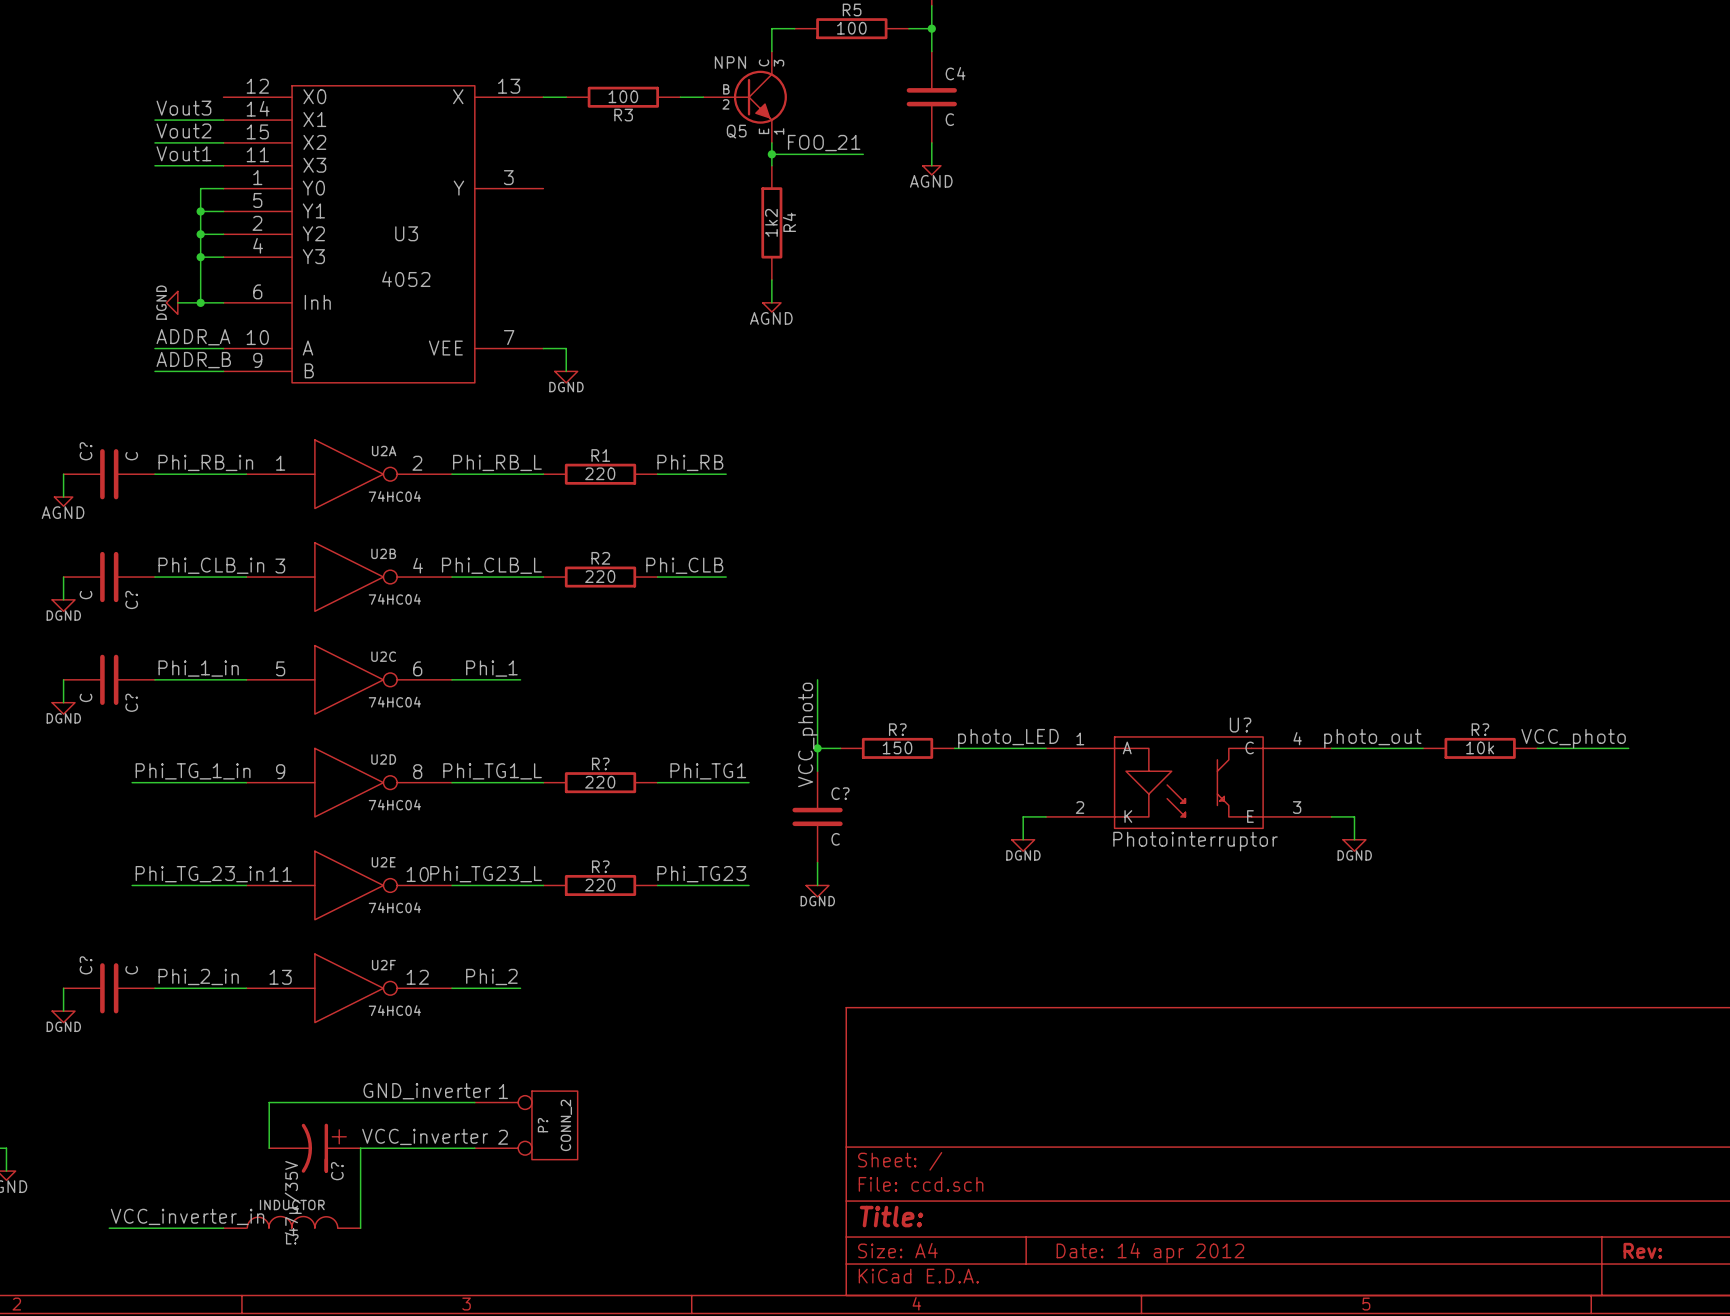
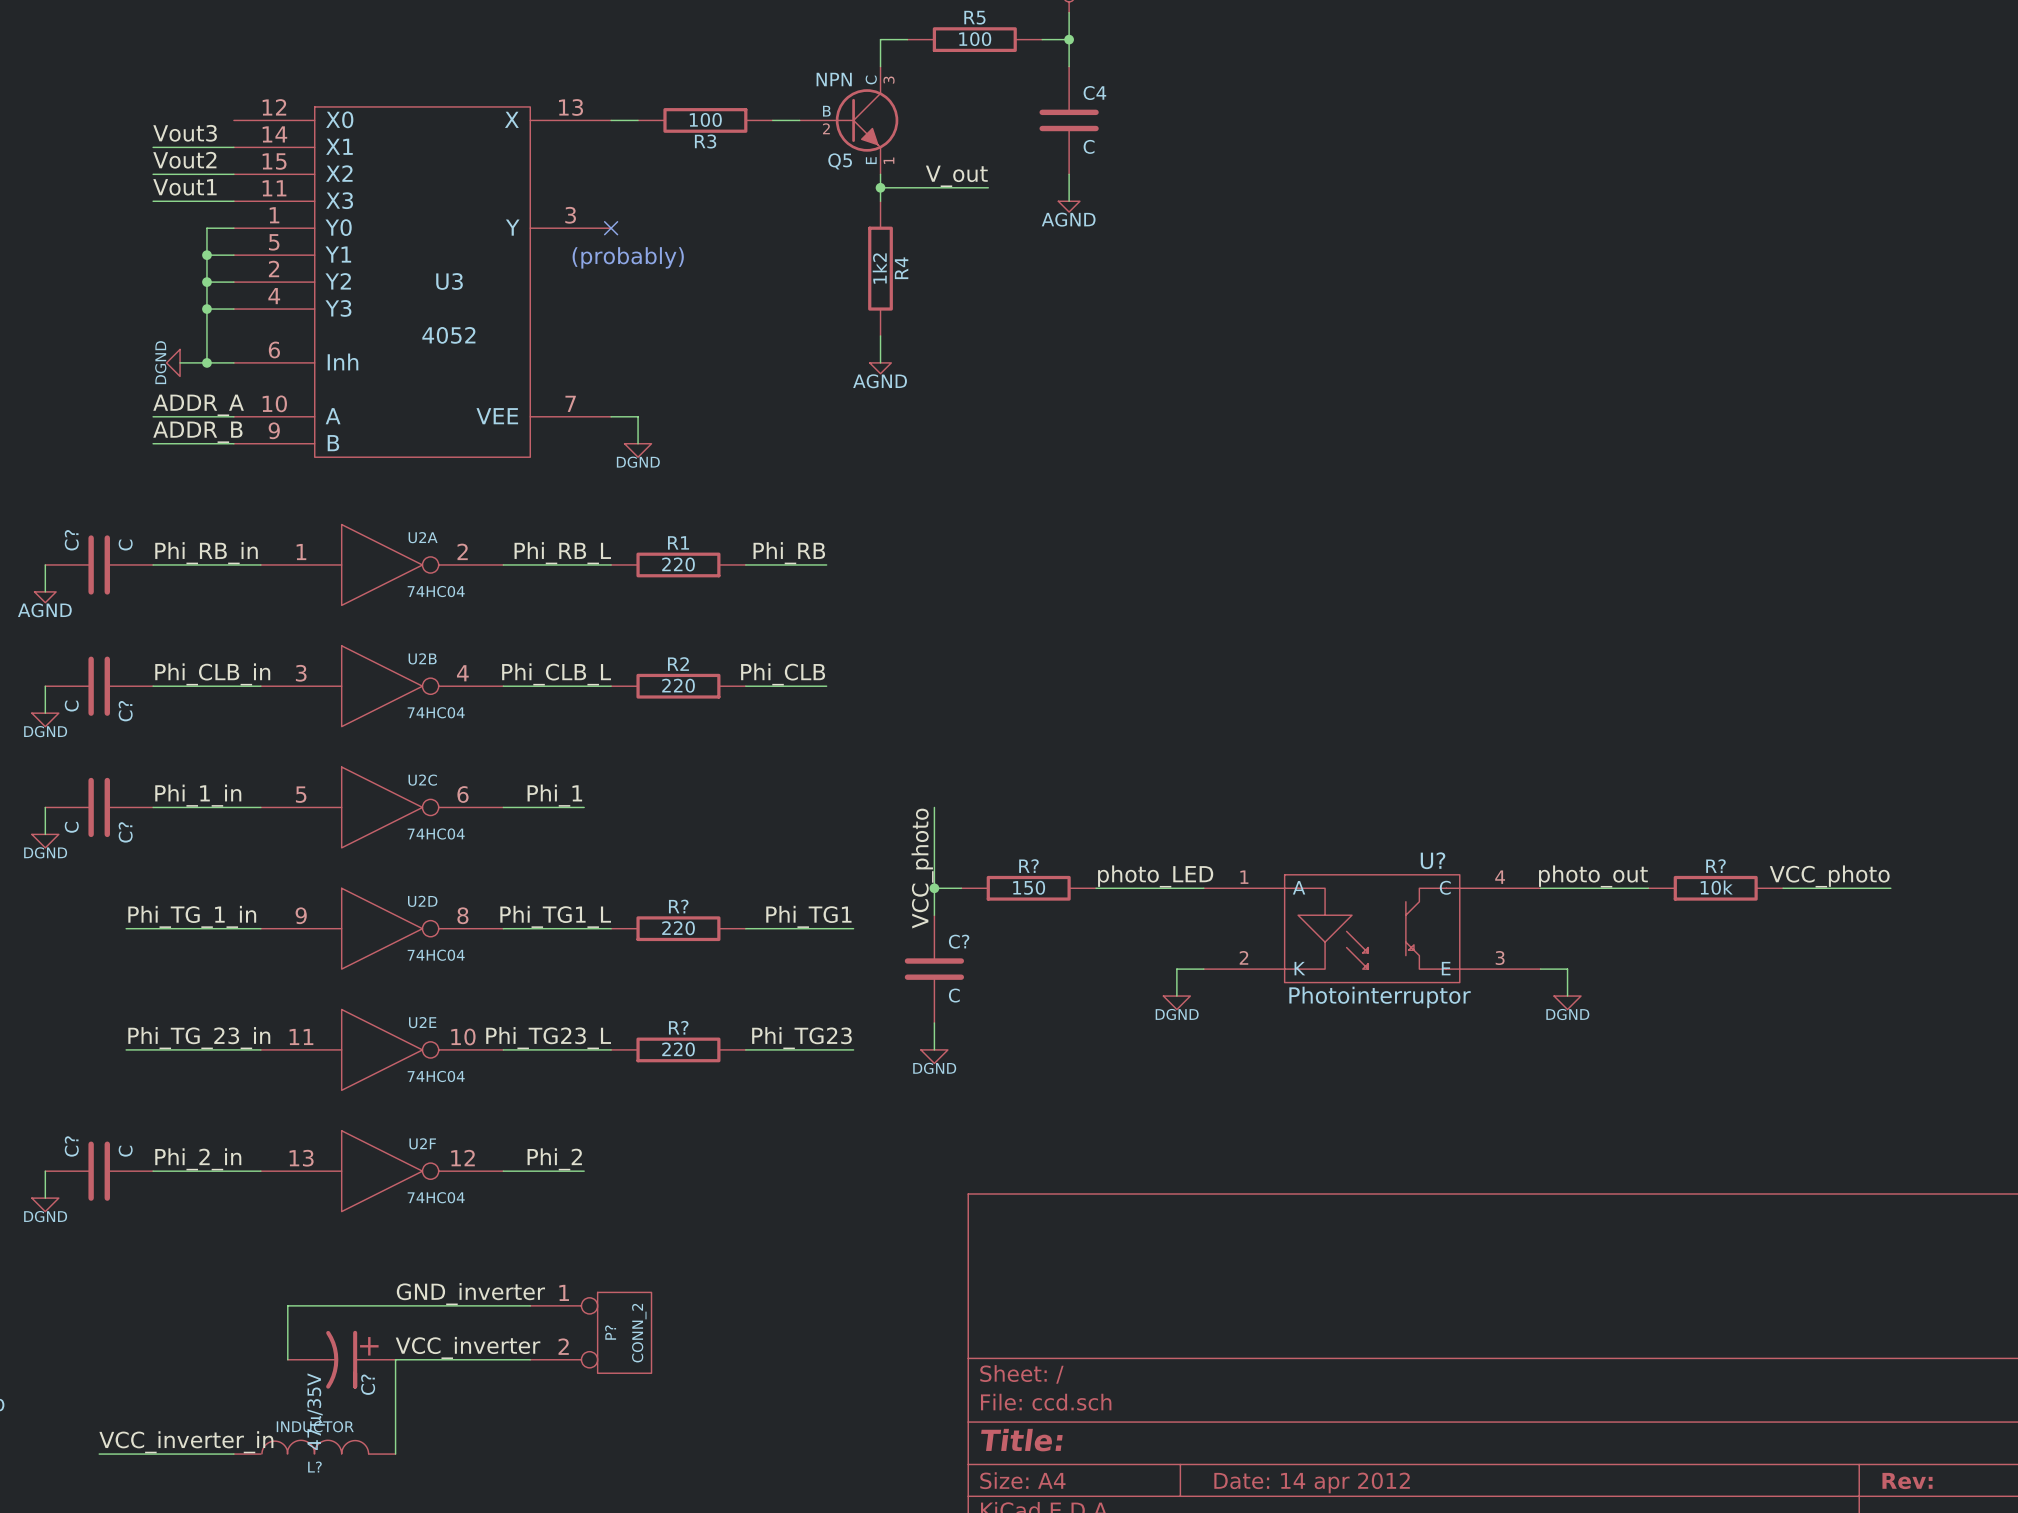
label: FOO_21 (824, 143) -> V_out (956, 176)
no-connect mark: none -> (611, 228)
text: none -> (probably) (628, 257)

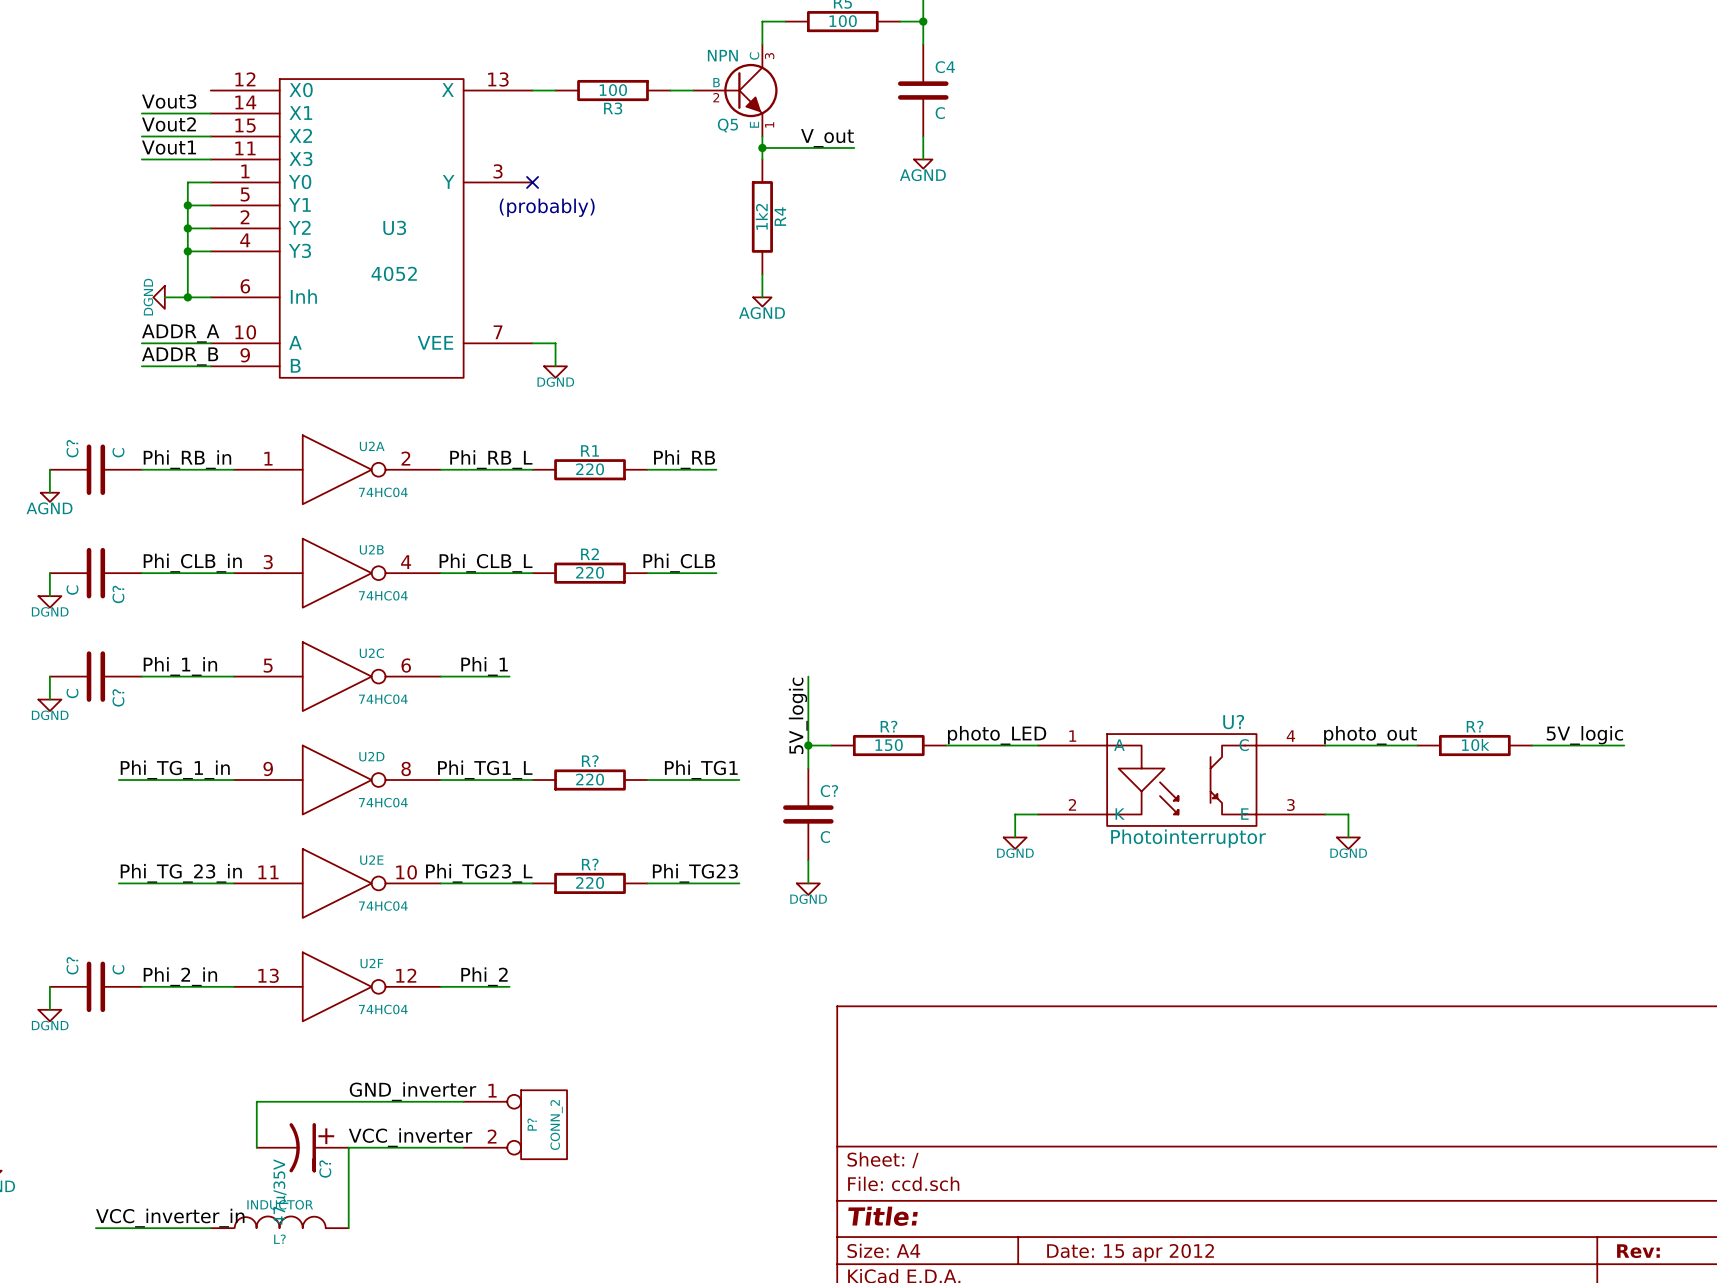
label: VCC_photo (922, 868) -> 5V_logic (798, 715)
label: VCC_photo (1829, 876) -> 5V_logic (1584, 735)
title block: Date: 14 apr 2012 (1312, 1482) -> Date: 15 apr 2012 (1130, 1252)

